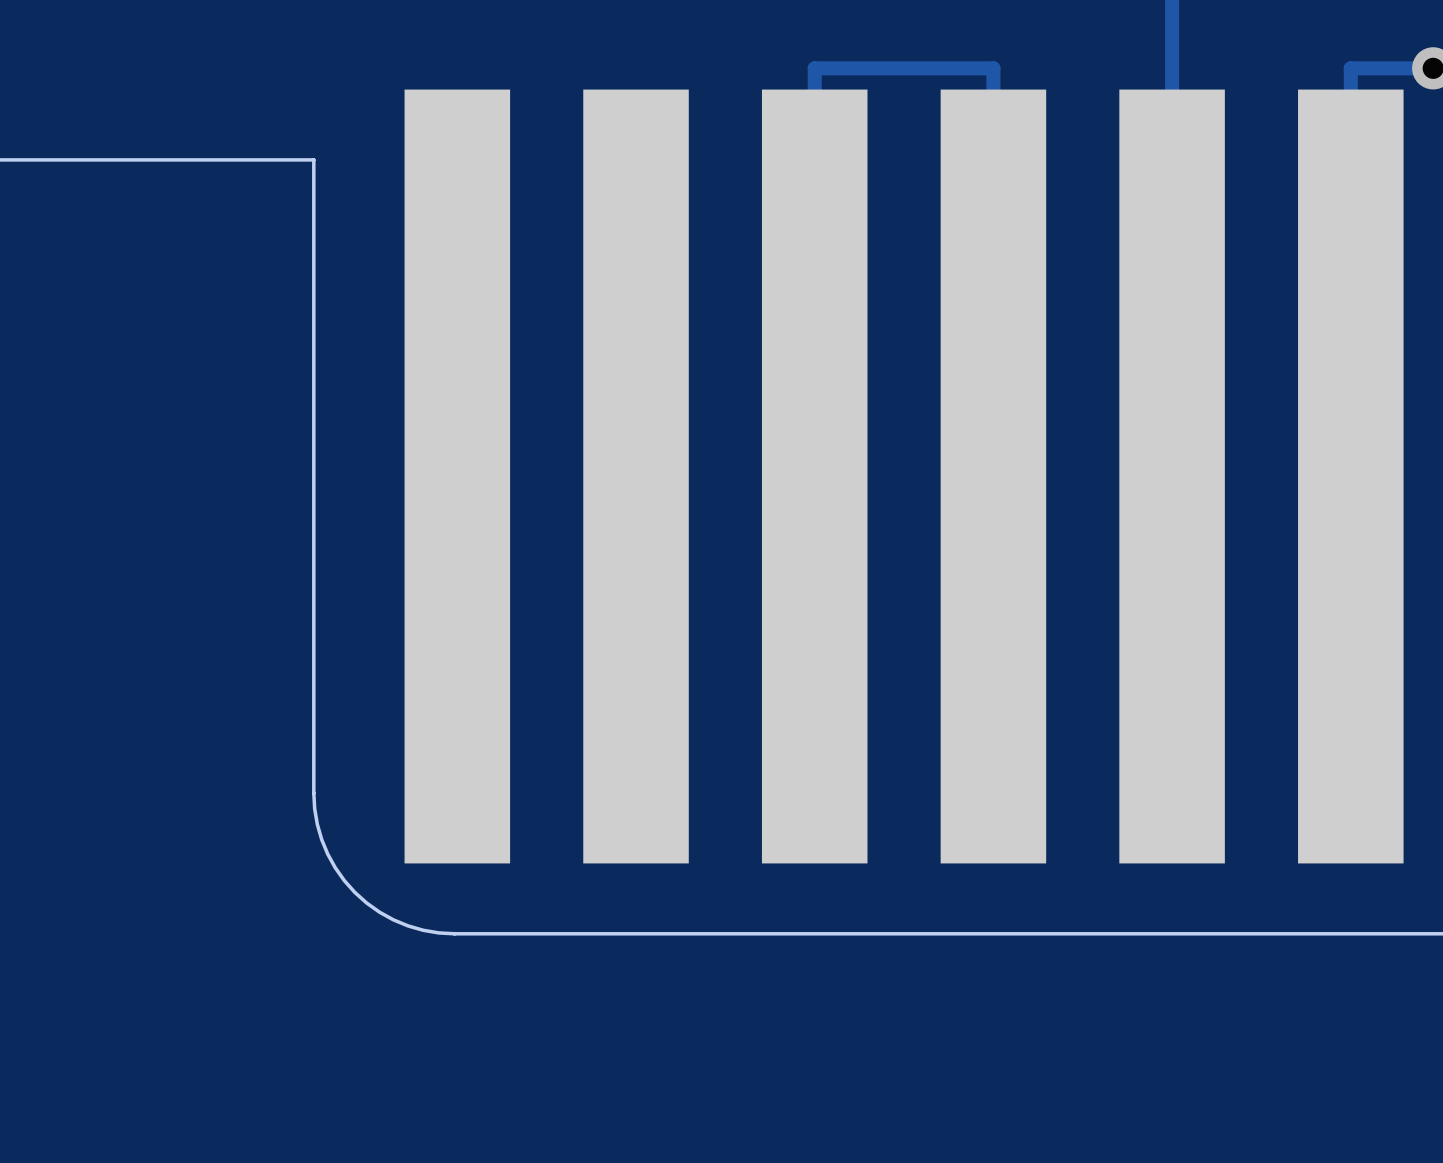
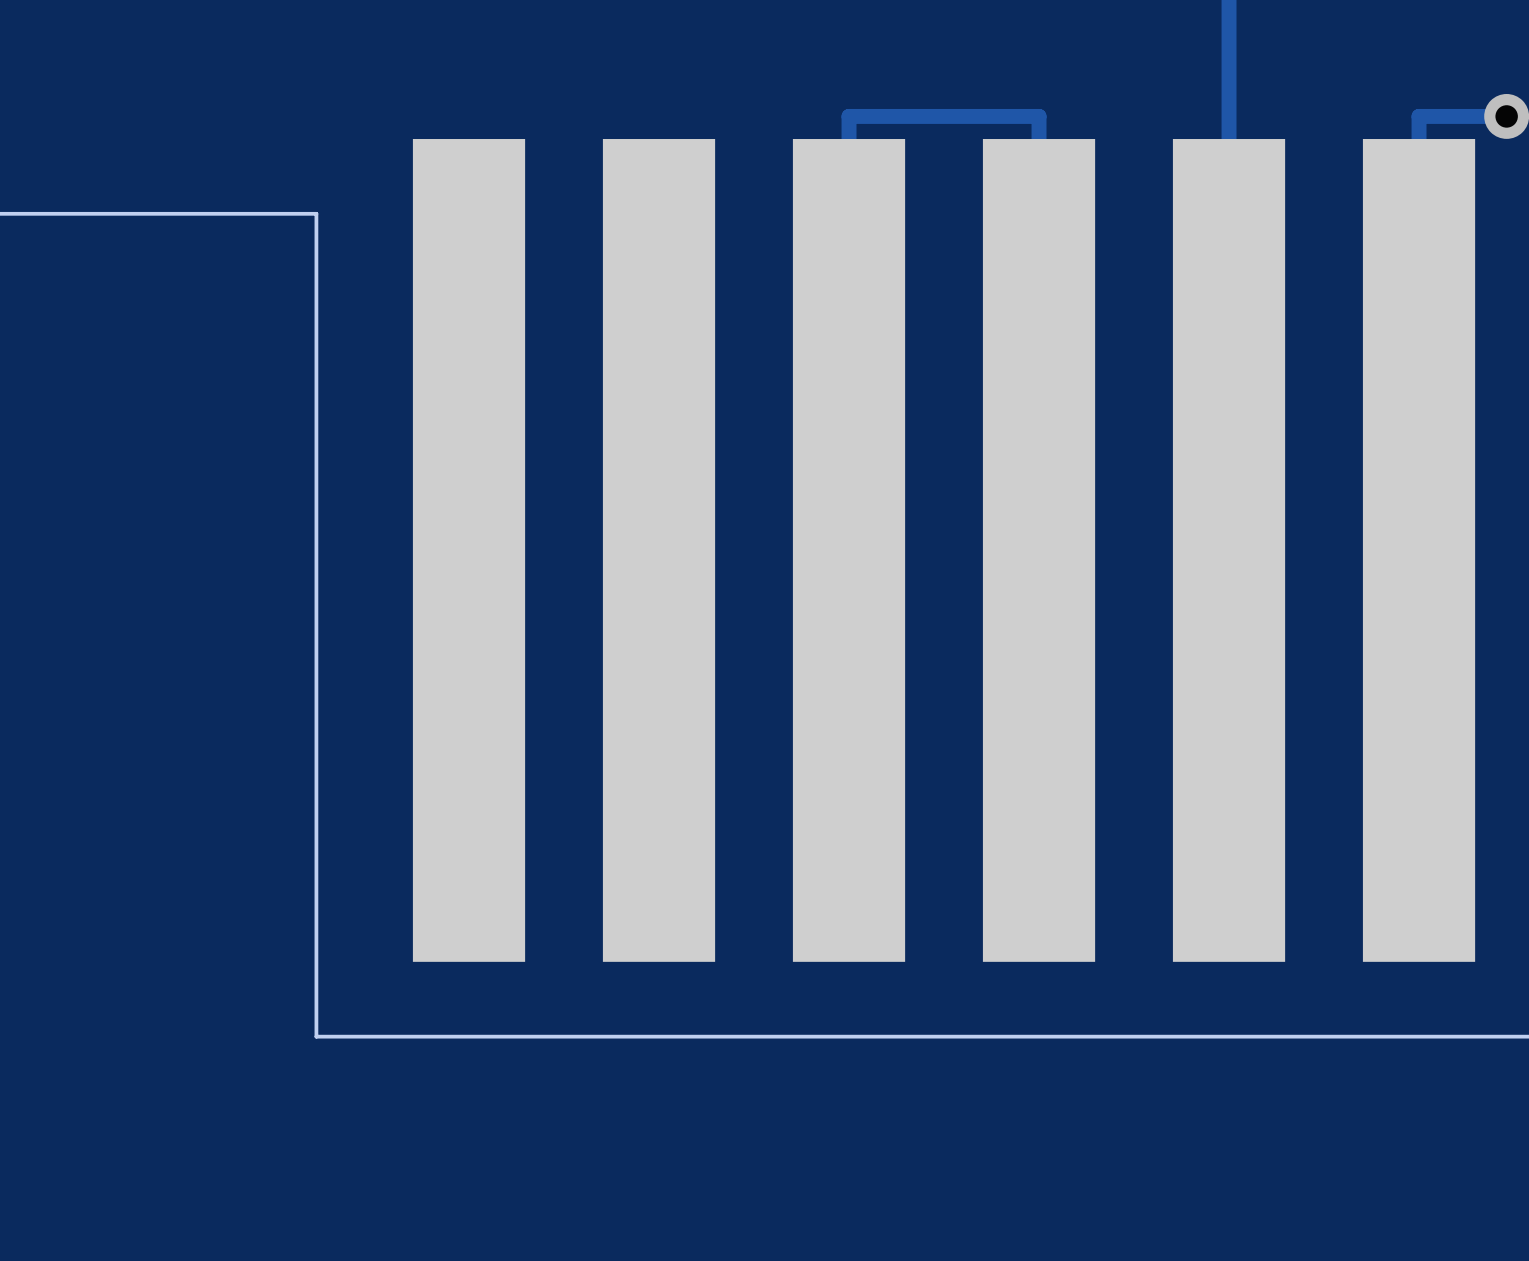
board edge: (313, 793) (314, 808) (321, 839) (335, 867) (355, 892) (379, 912) (408, 925) (423, 930) (454, 933) -> (316, 887) (316, 1036) (466, 1036)

